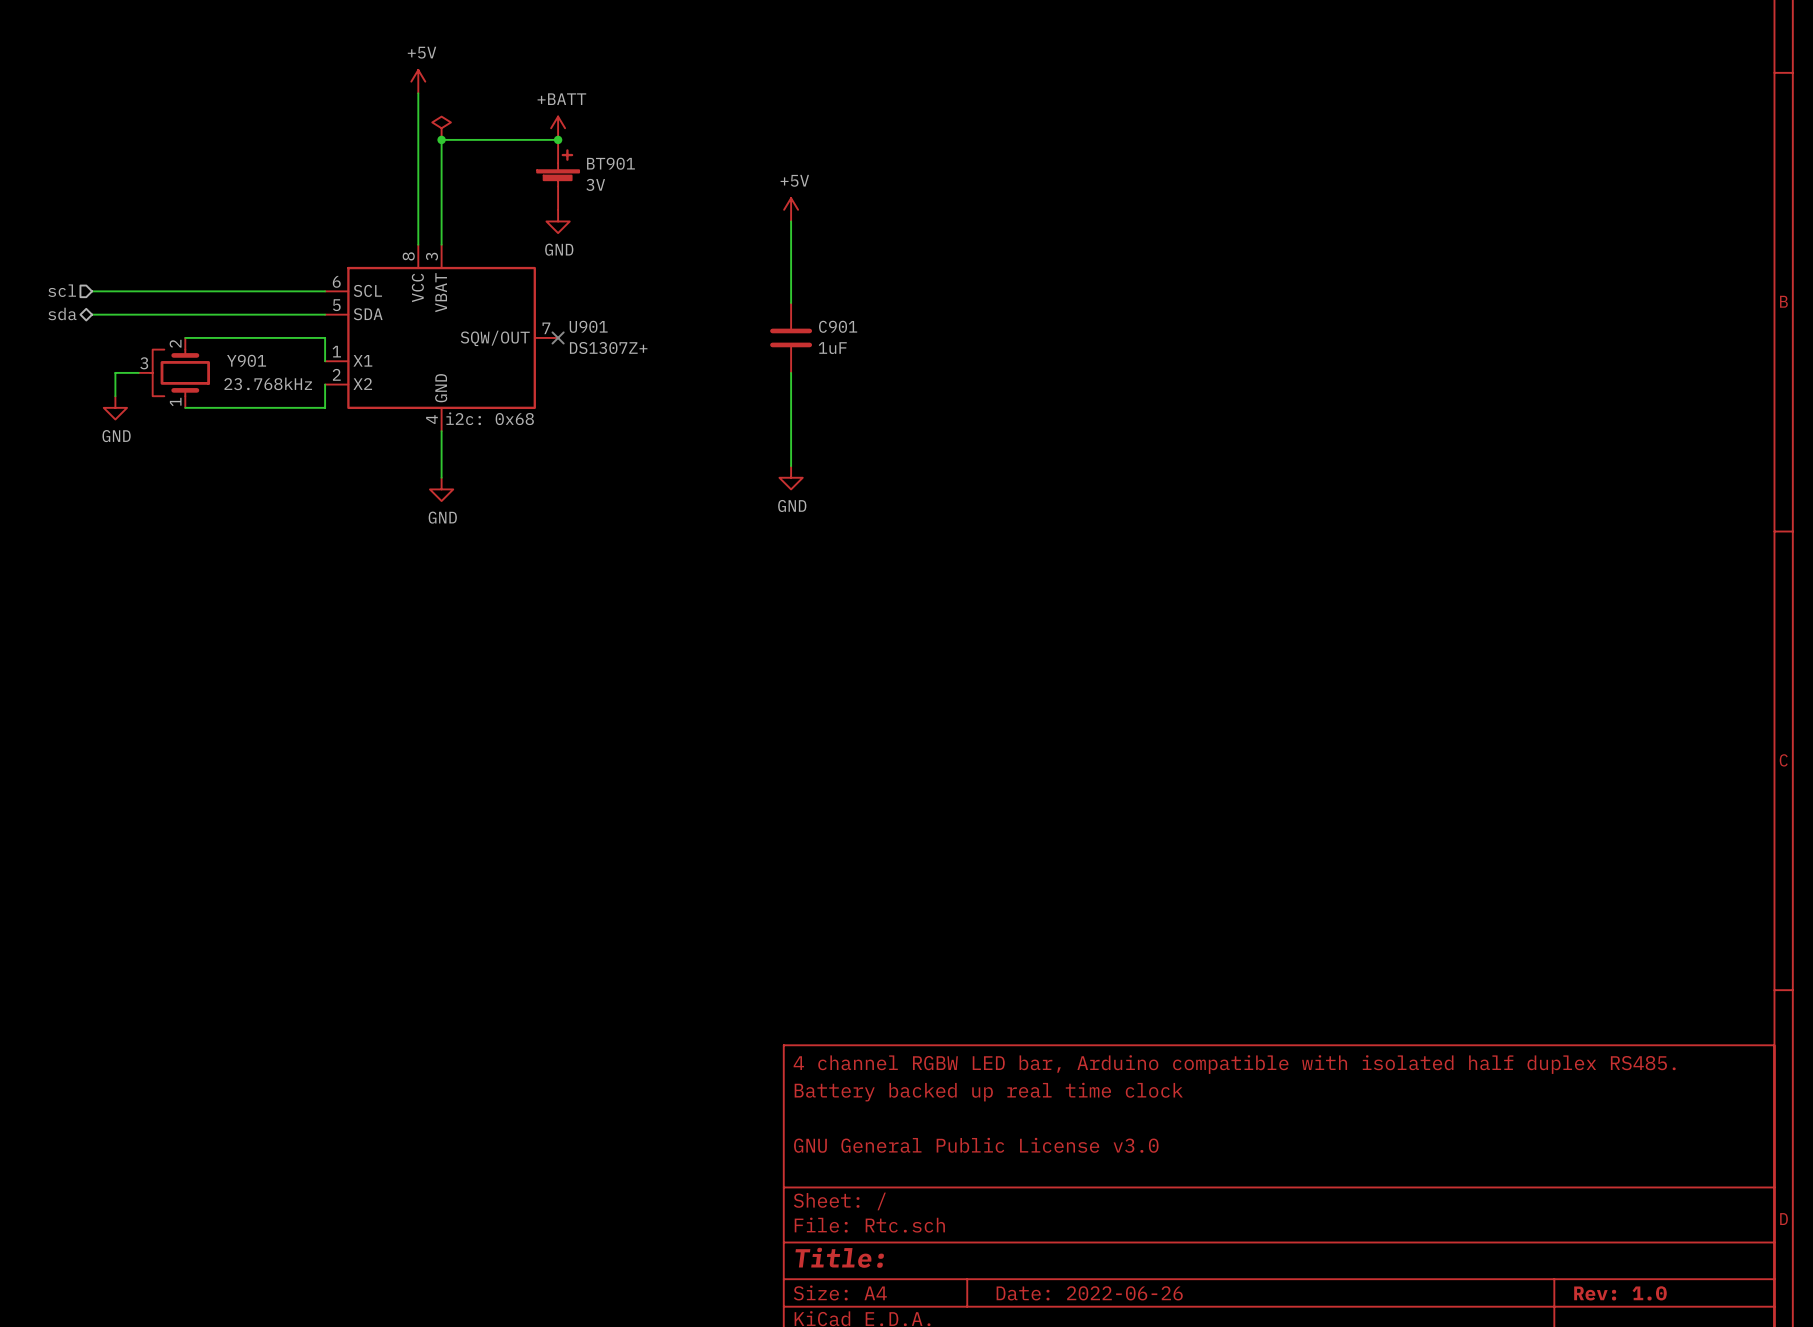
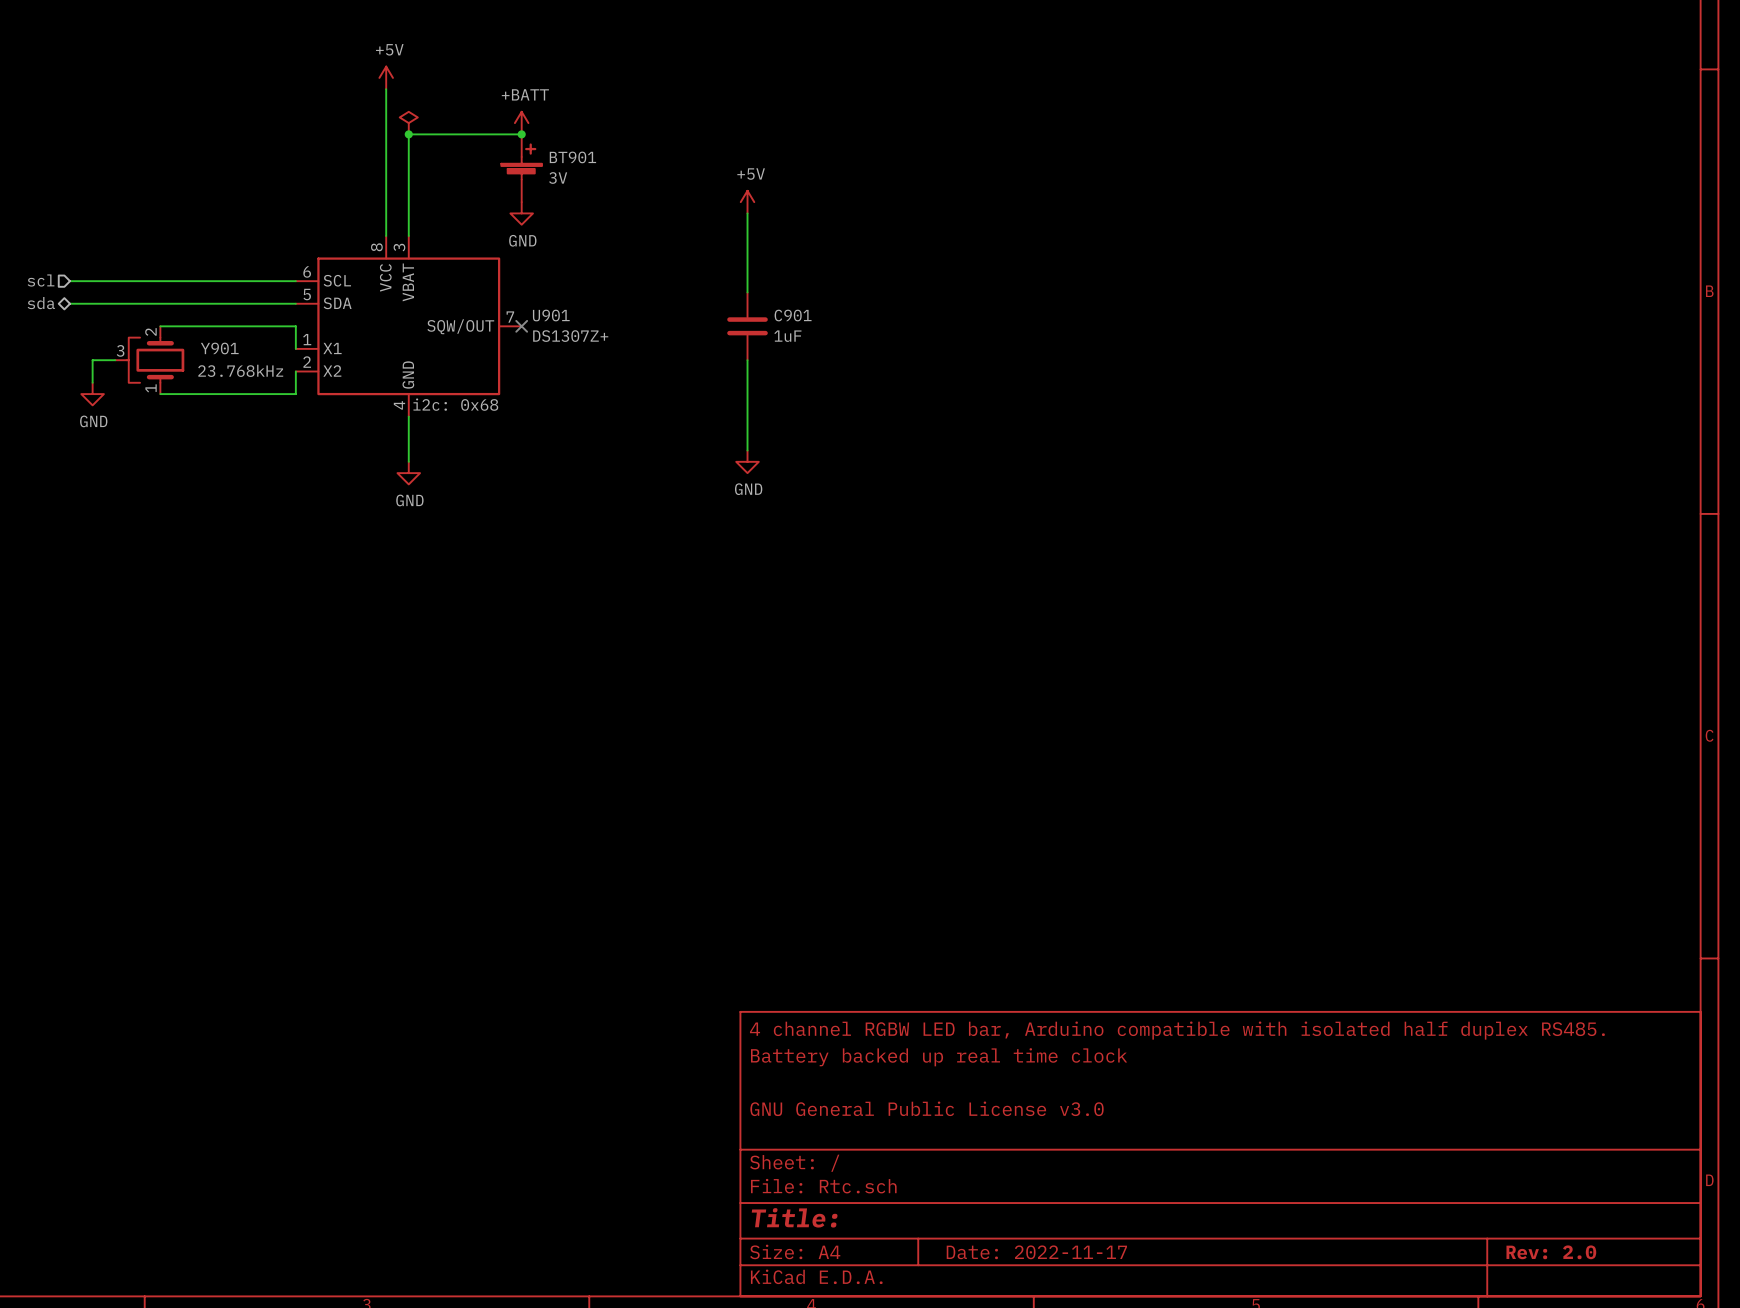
title block: Date: 2022-06-26 (1089, 1293) -> Date: 2022-11-17 (1036, 1252)
title block: Rev: 1.0 (1620, 1293) -> Rev: 2.0 (1551, 1252)

